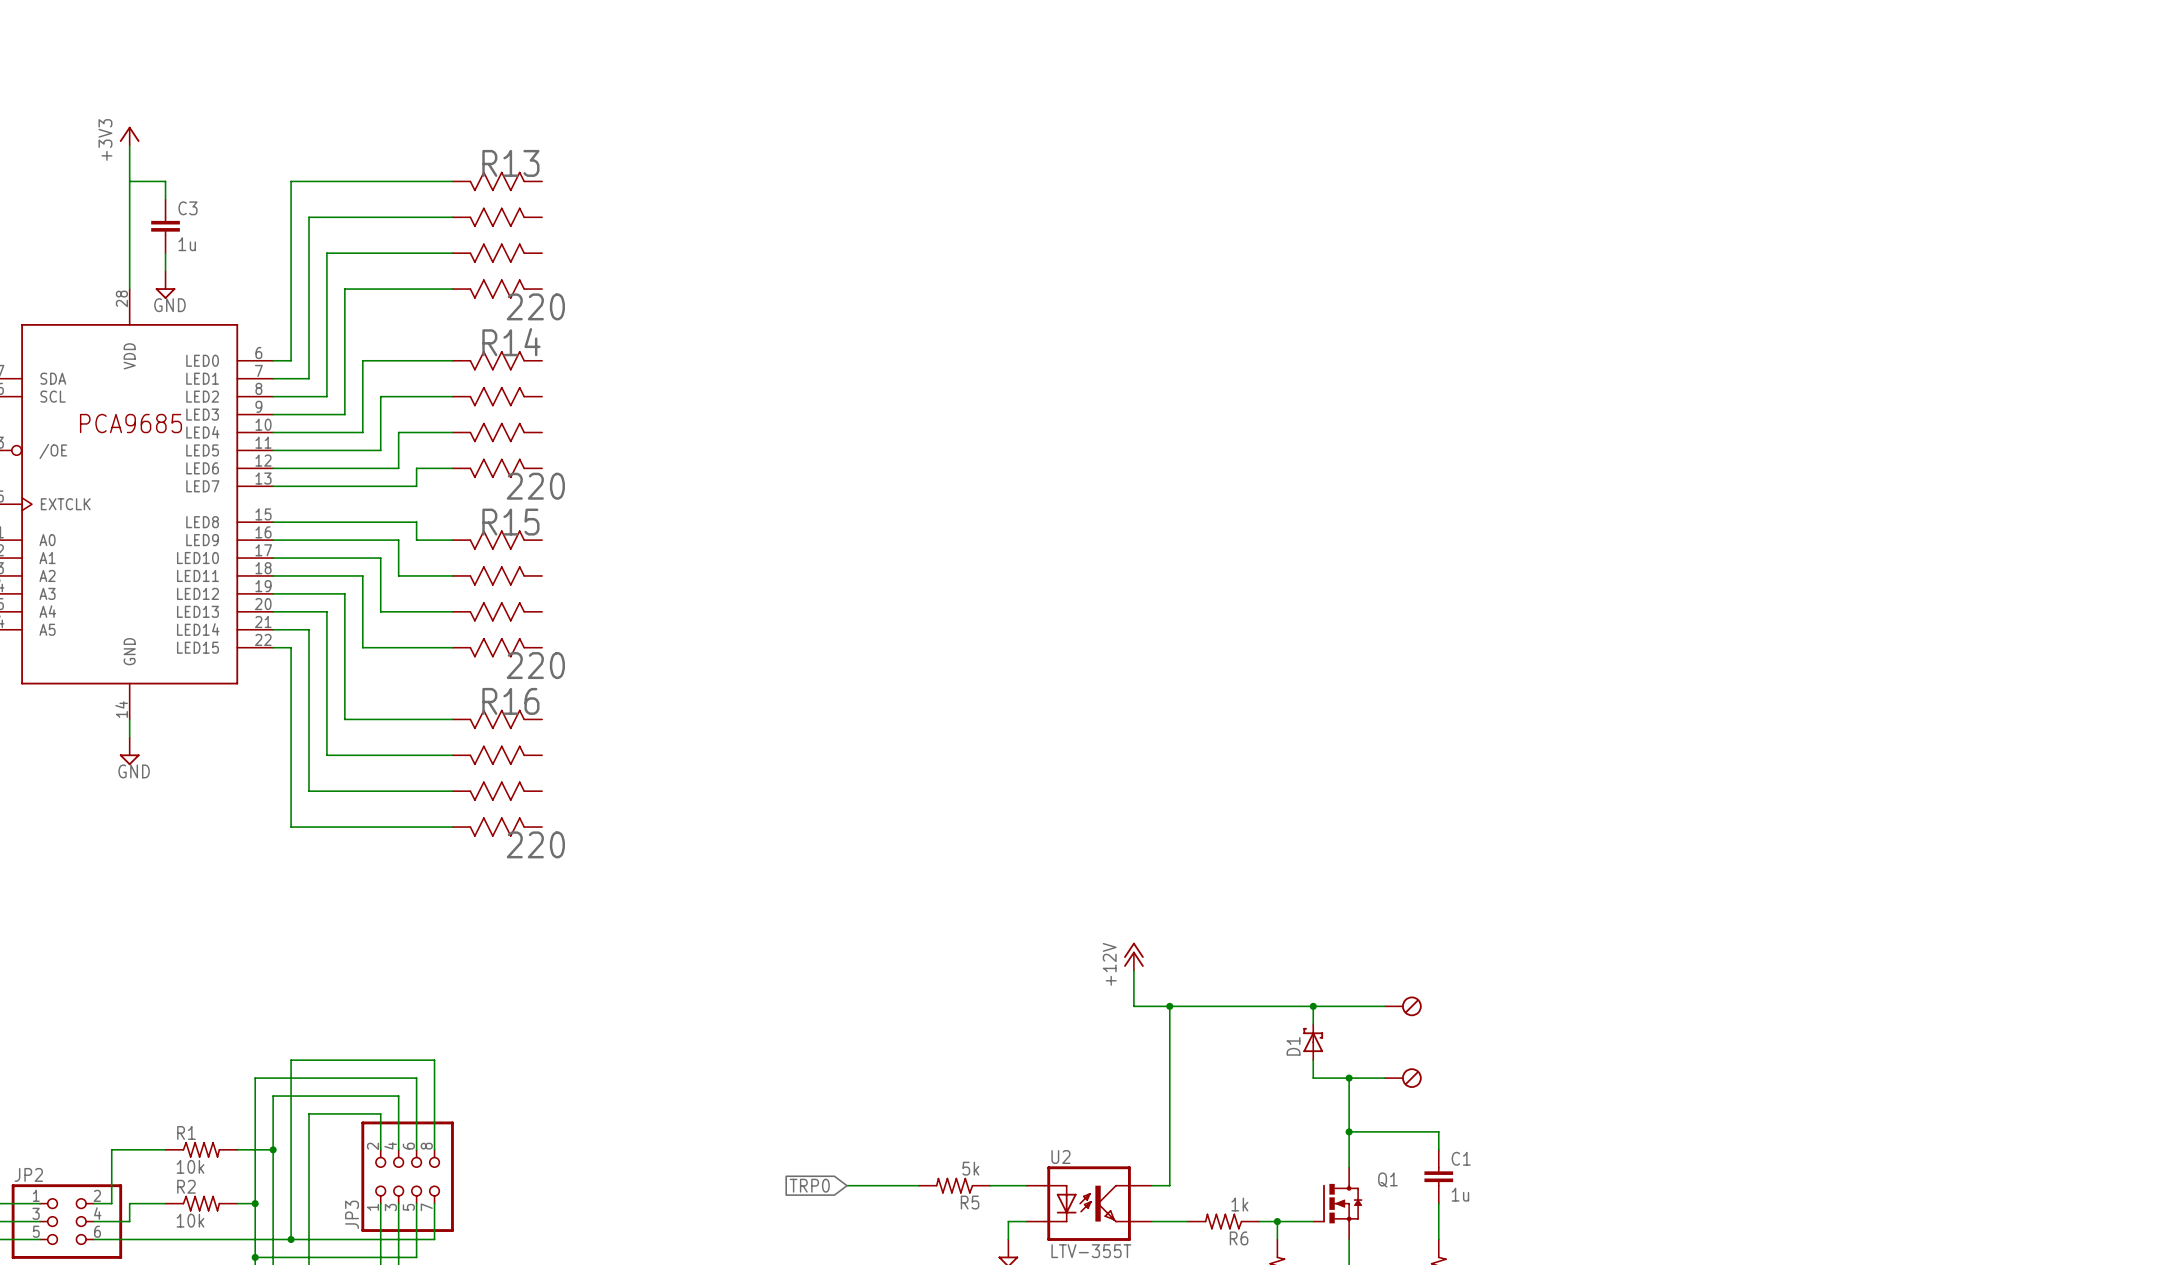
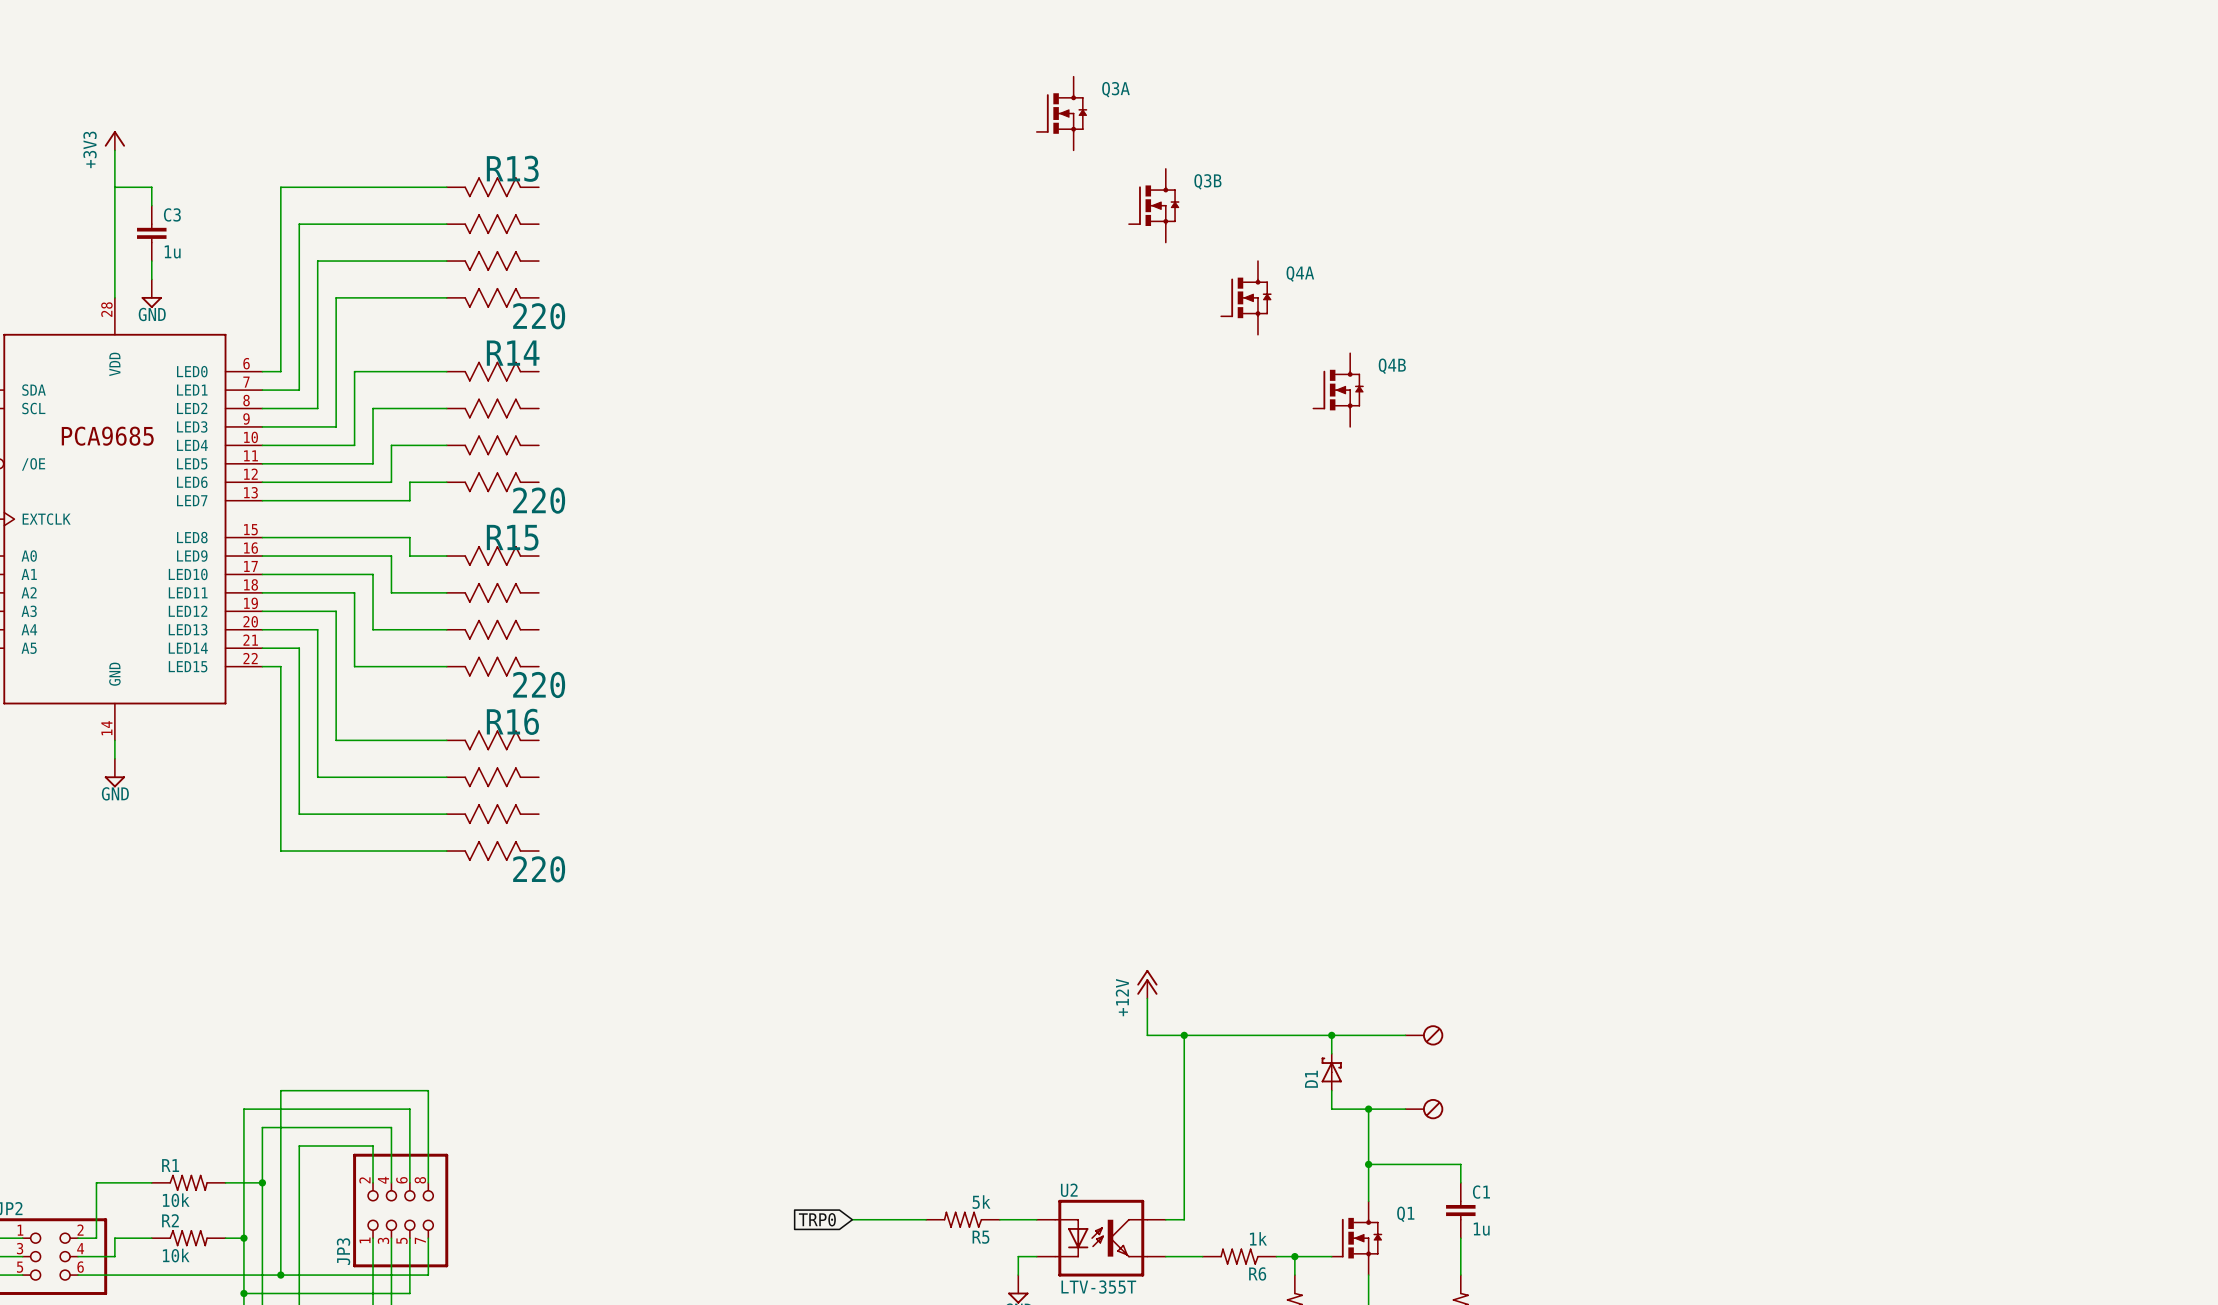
Q3A: none -> (1061, 113)
Q3B: none -> (1153, 205)
Q4A: none -> (1246, 297)
Q4B: none -> (1338, 390)

